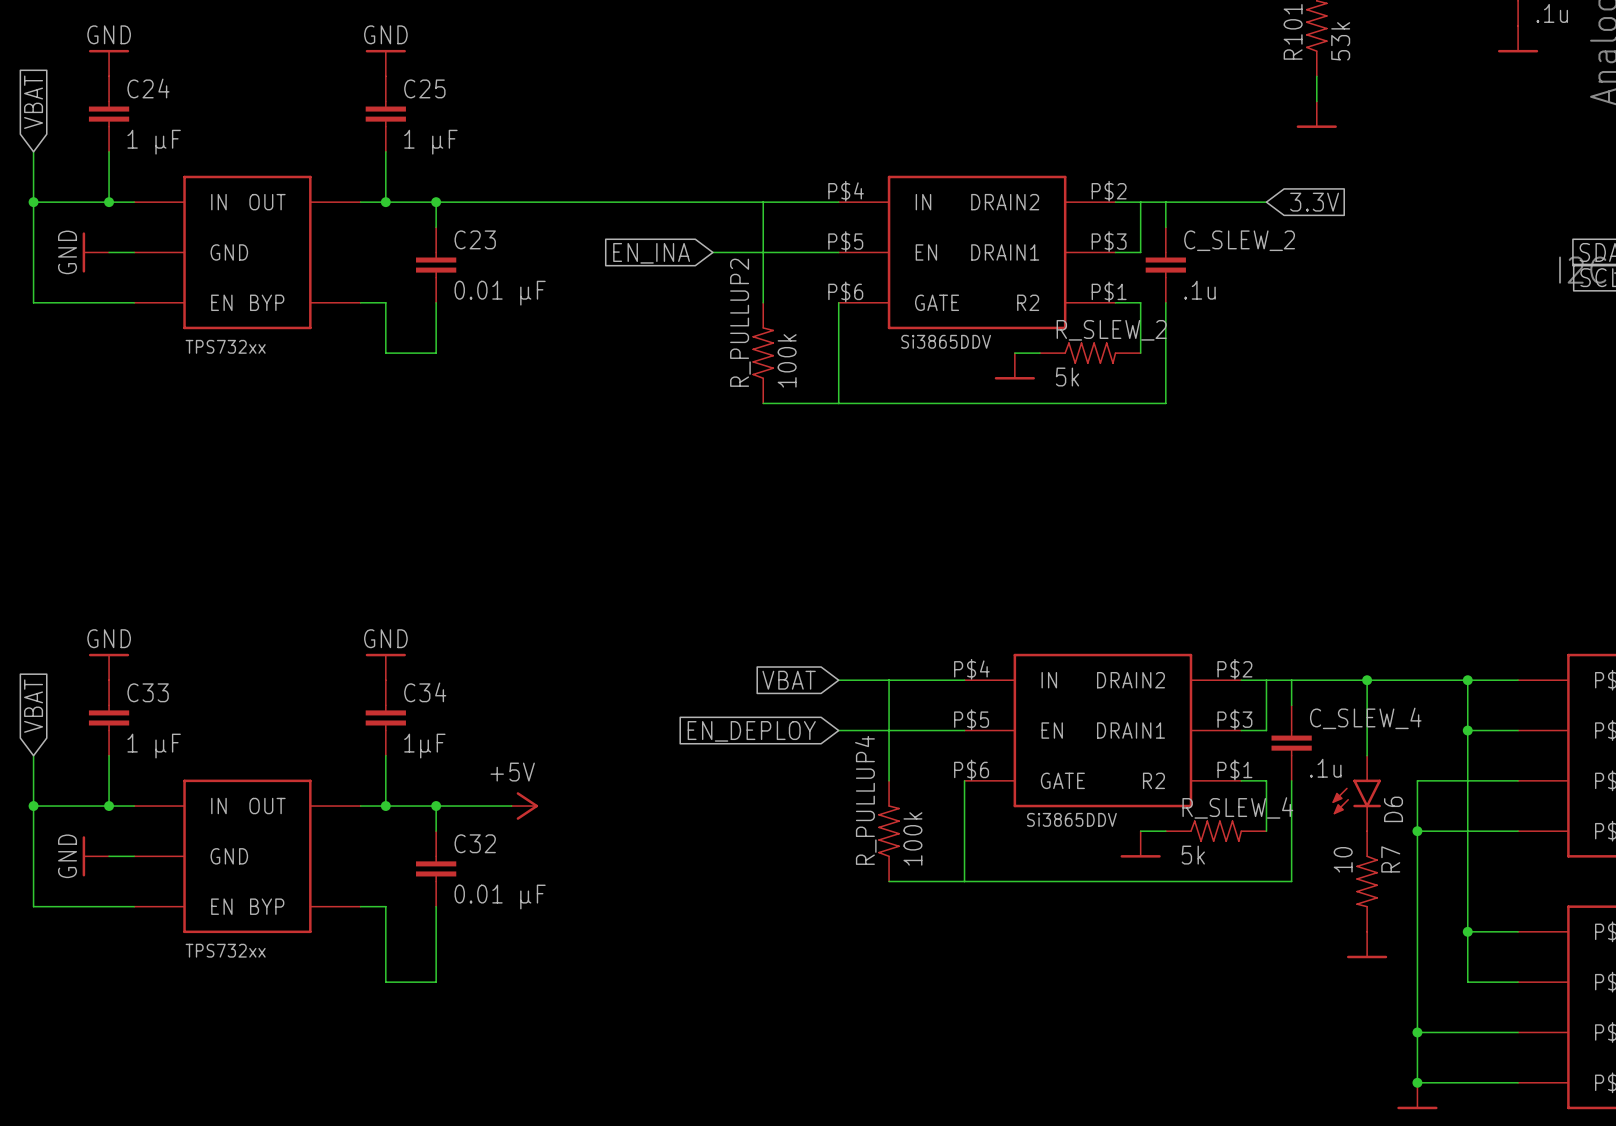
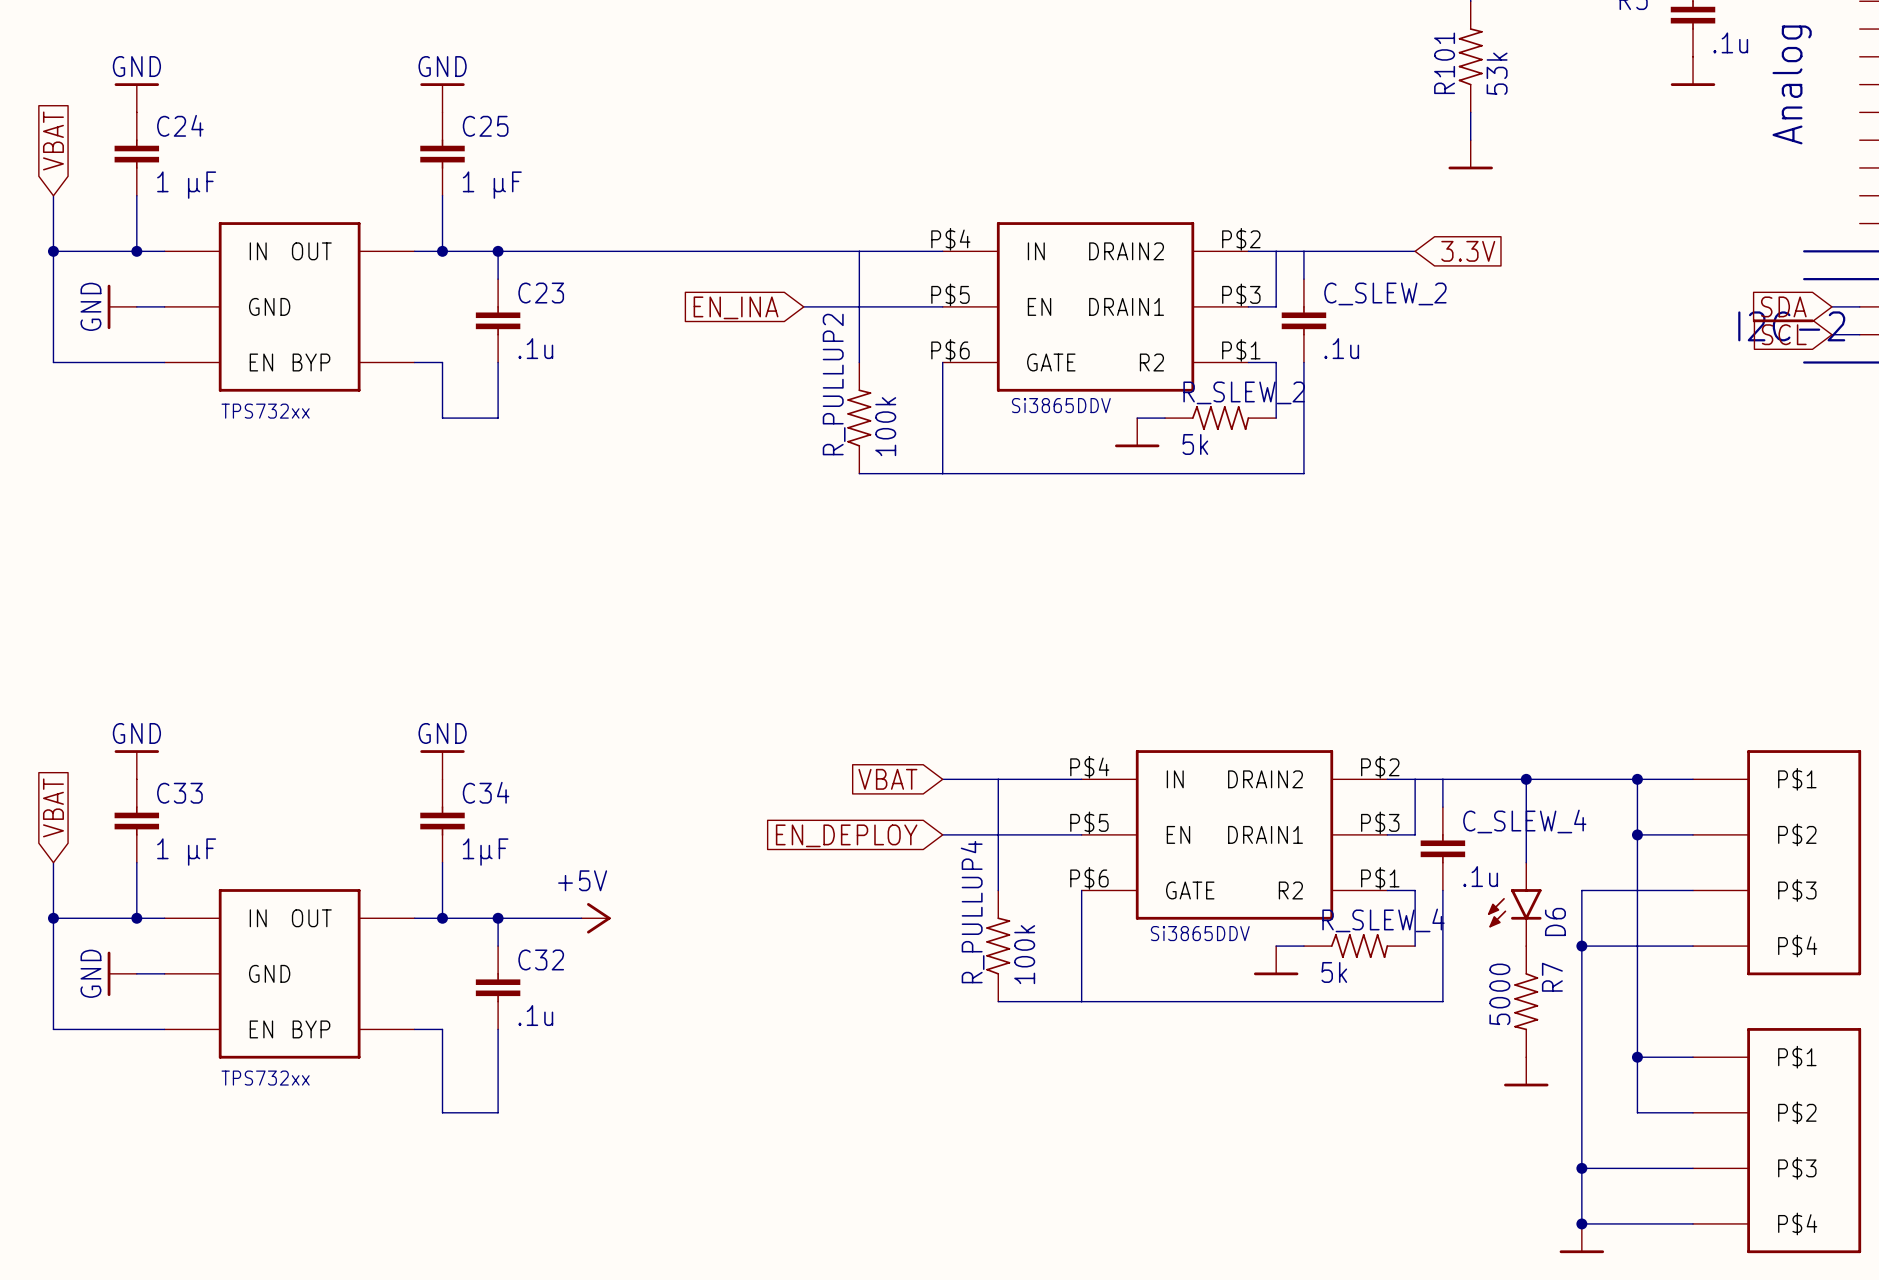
C23 value: 0.01 μF (500, 293) -> .1u (535, 348)
R7 value: 10 (1343, 859) -> 5000 (1499, 994)
C32 value: 0.01 μF (500, 897) -> .1u (535, 1015)

